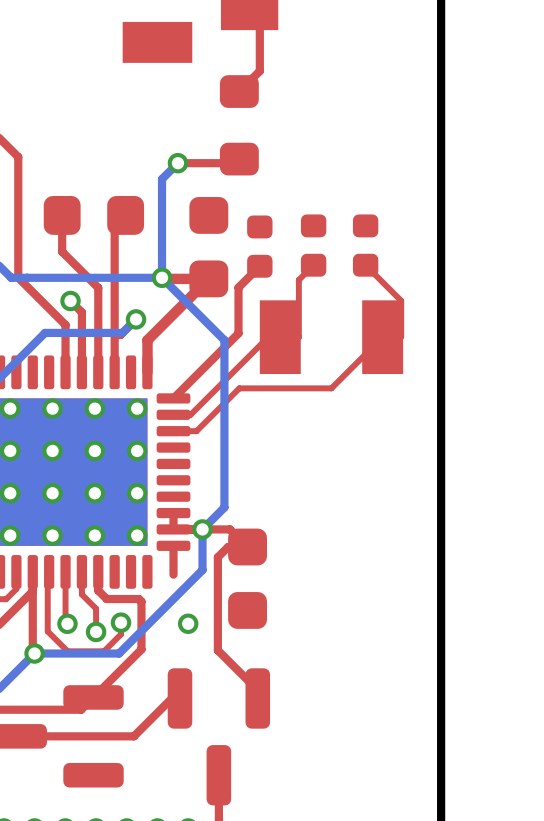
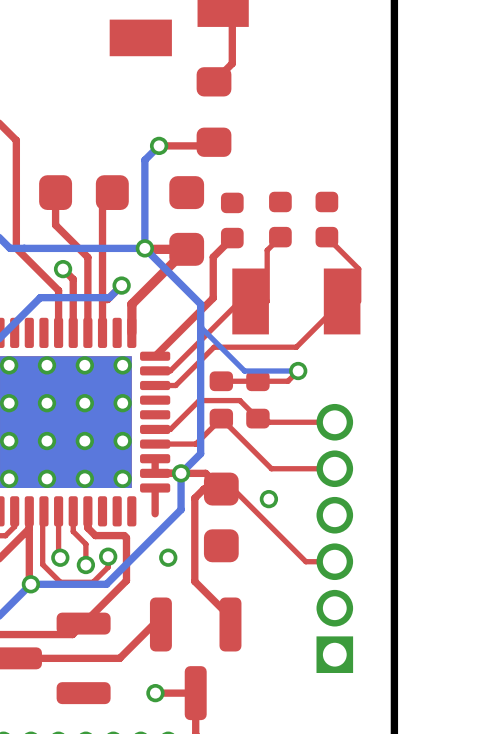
bottom track: none -> (200, 327) (244, 371) (298, 371)
top track: none -> (298, 371) (287, 381) (221, 381)
via: none -> (298, 371)
part: none -> (221, 399)
part: none -> (257, 399)
top track: none -> (334, 422) (268, 422) (265, 418) (257, 418) (239, 400) (199, 400) (170, 429) (155, 429)
top track: none -> (155, 444) (195, 444) (221, 418) (271, 468) (334, 468)
top track: none -> (221, 489) (233, 489) (305, 561) (334, 561)
via: none -> (268, 499)
part: none -> (334, 538)
via: none -> (155, 693)
top track: none -> (195, 693) (155, 693)

